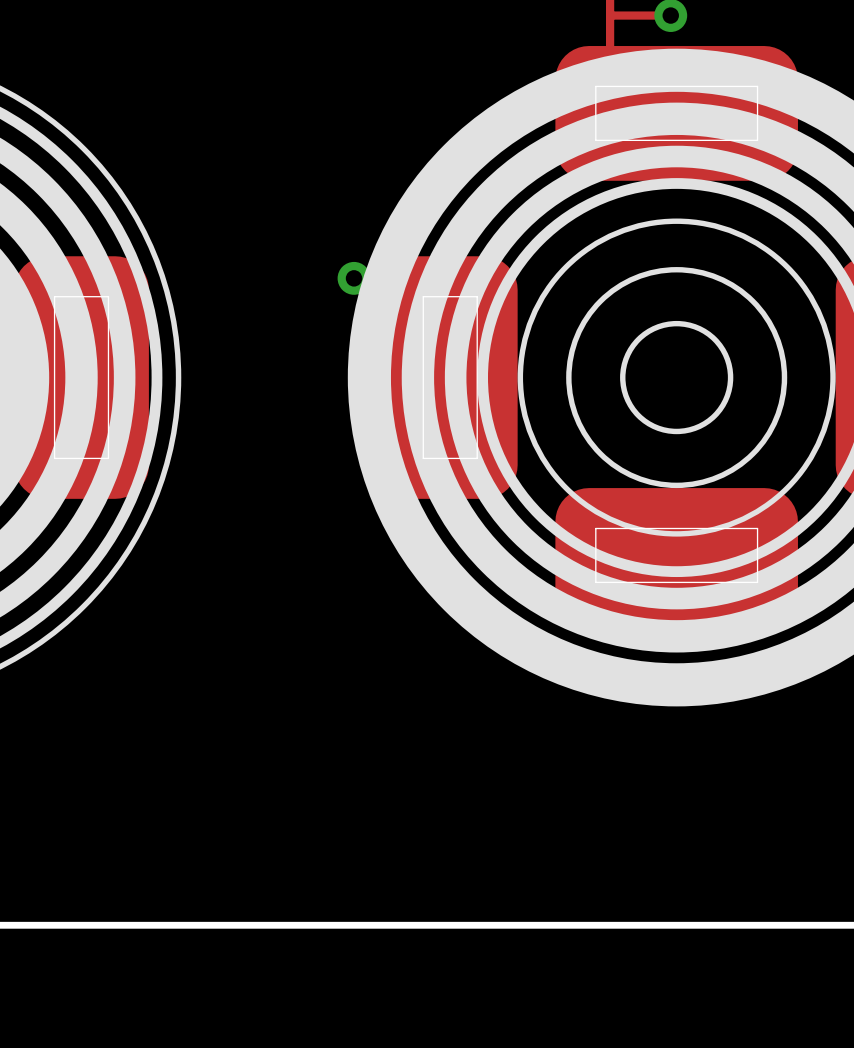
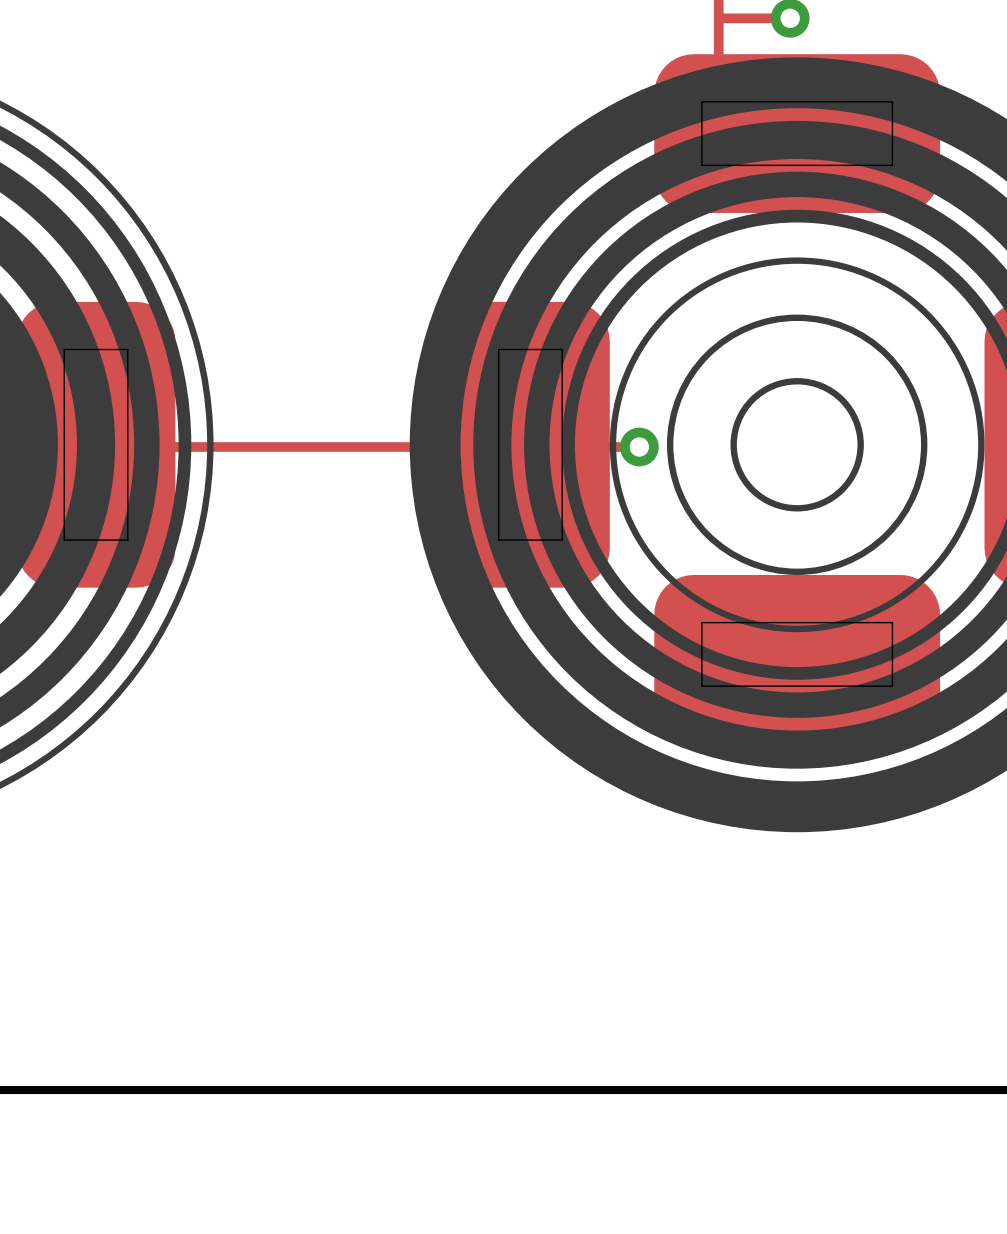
via position: (354, 278) -> (639, 447)
track: none -> (96, 444) (99, 447) (528, 447) (530, 444) (536, 447) (639, 447)

